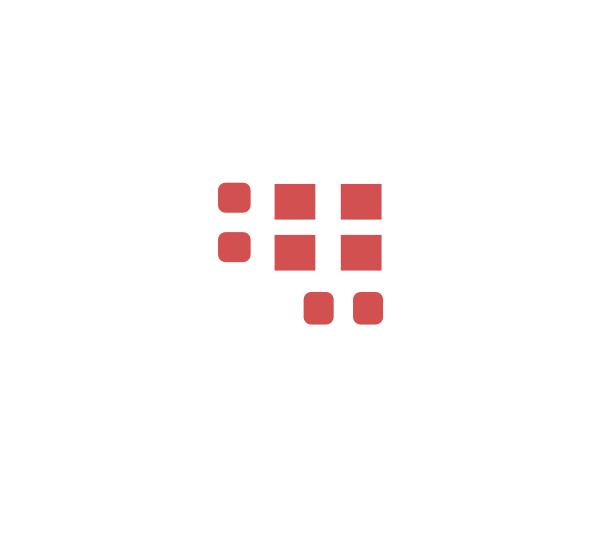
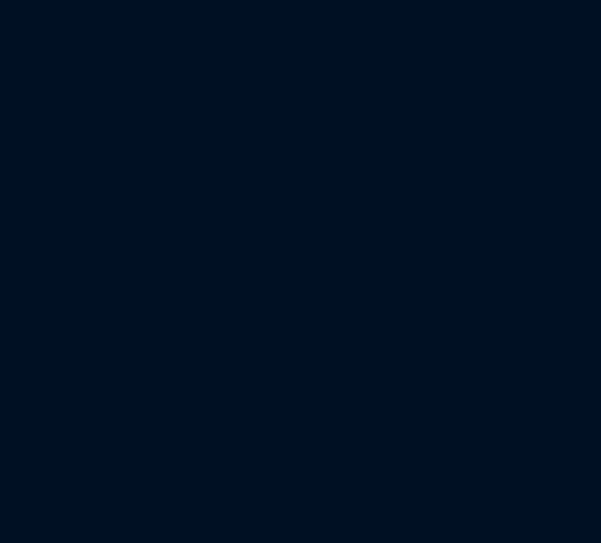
part: (234, 222) -> none
part: (328, 227) -> none
part: (343, 308) -> none

